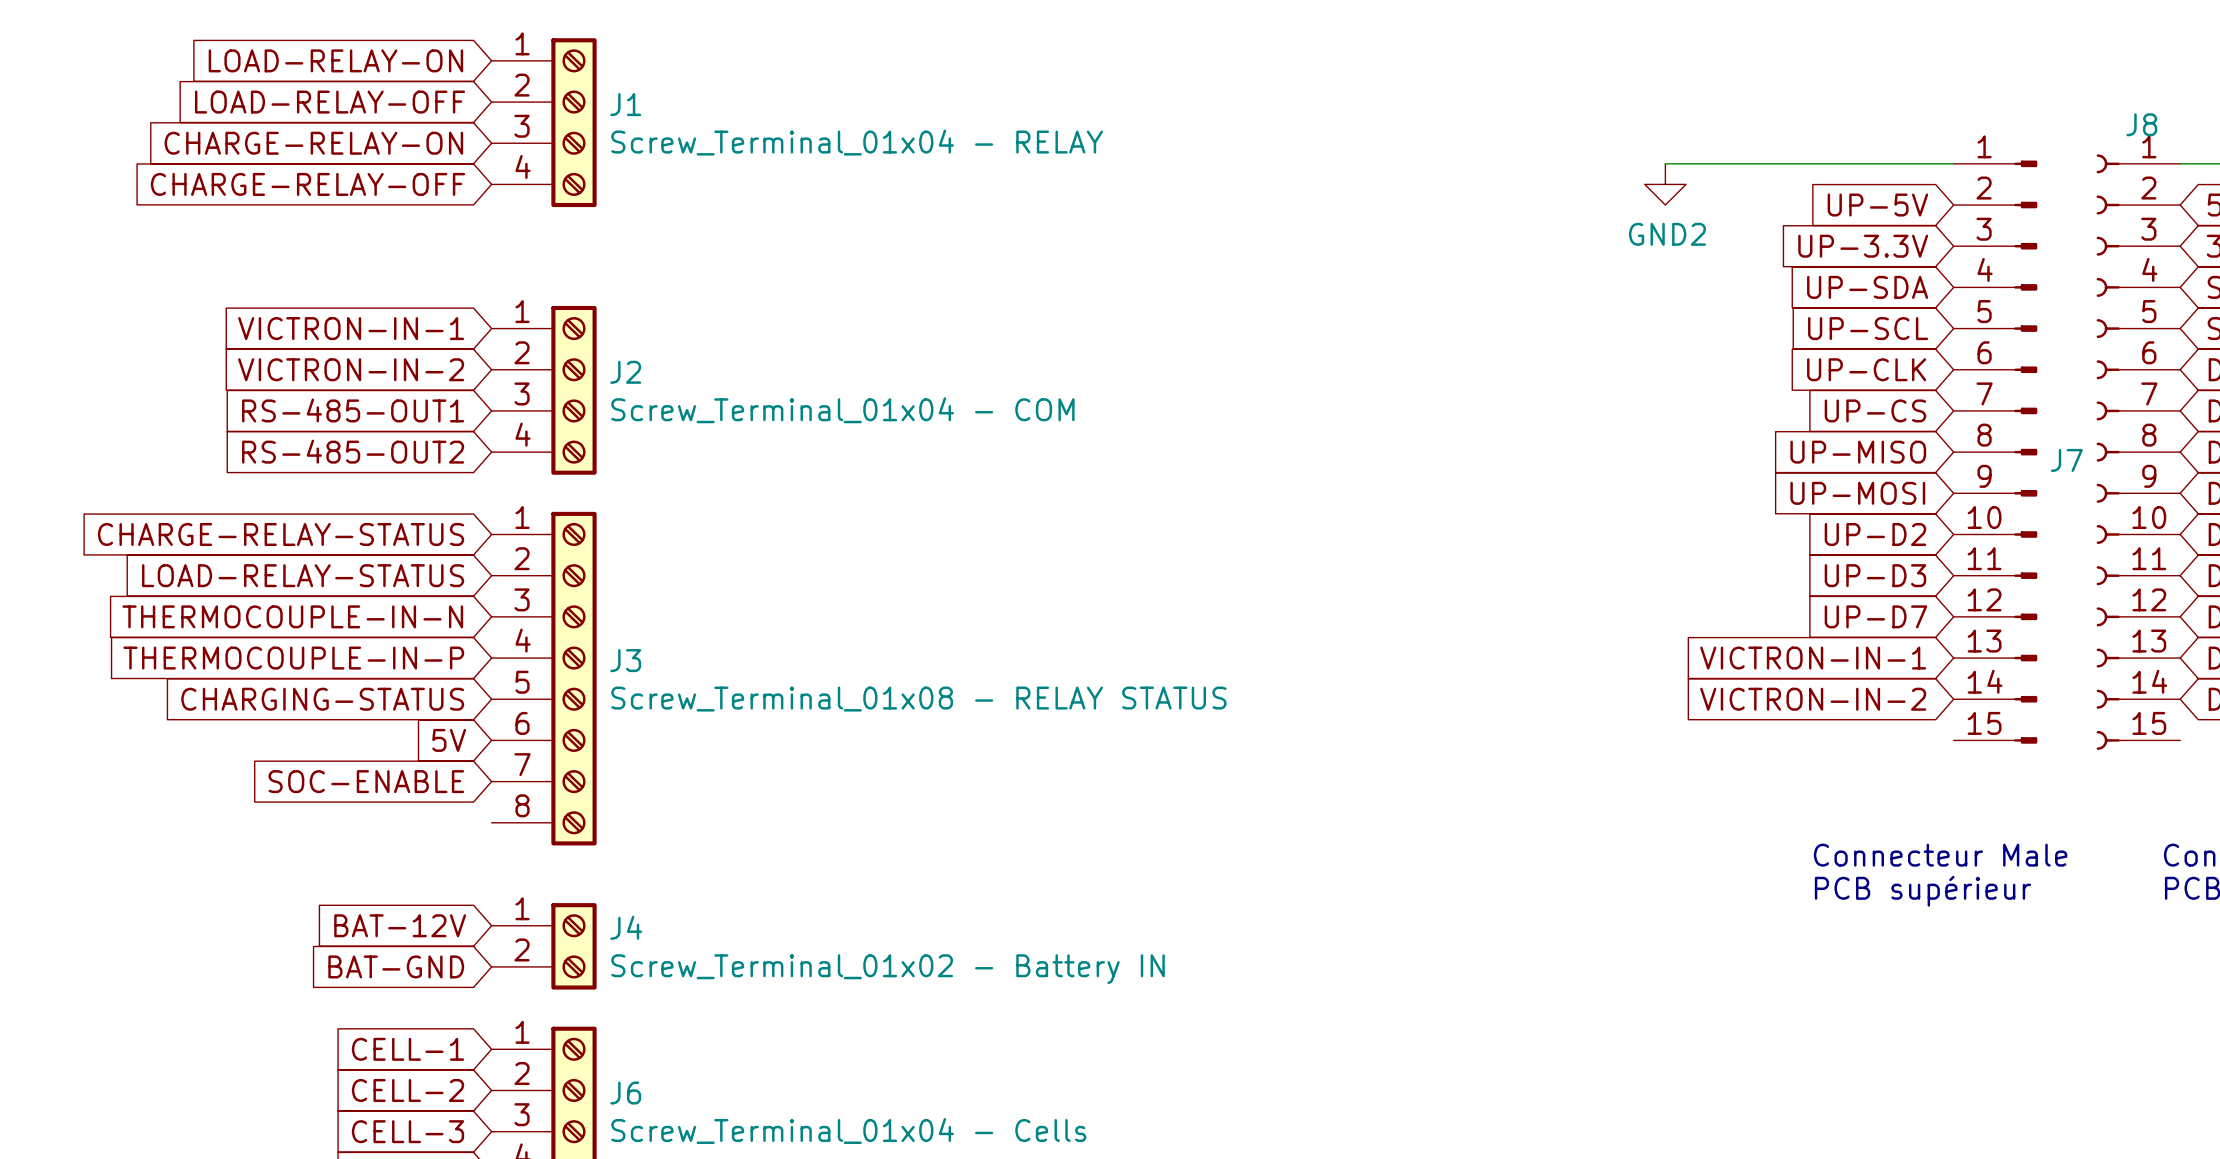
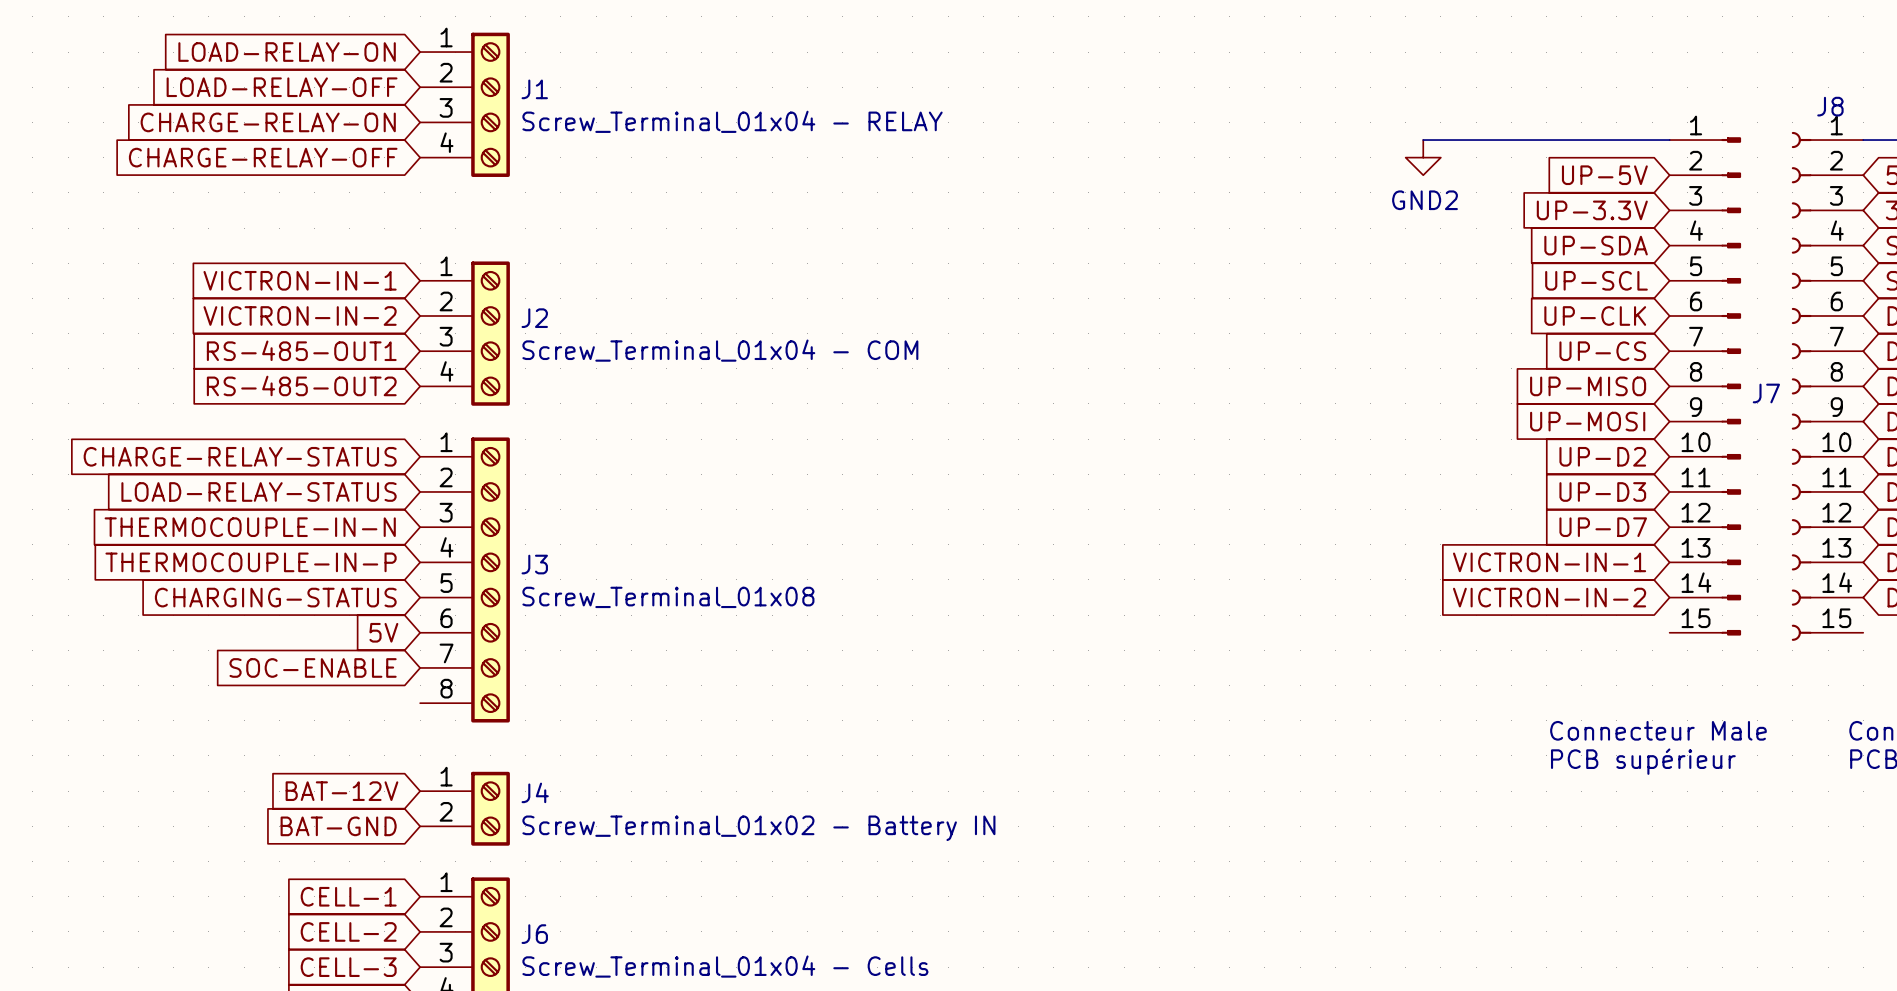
J3 value: Screw_Terminal_01x08 - RELAY STATUS (918, 699) -> Screw_Terminal_01x08 (668, 597)

